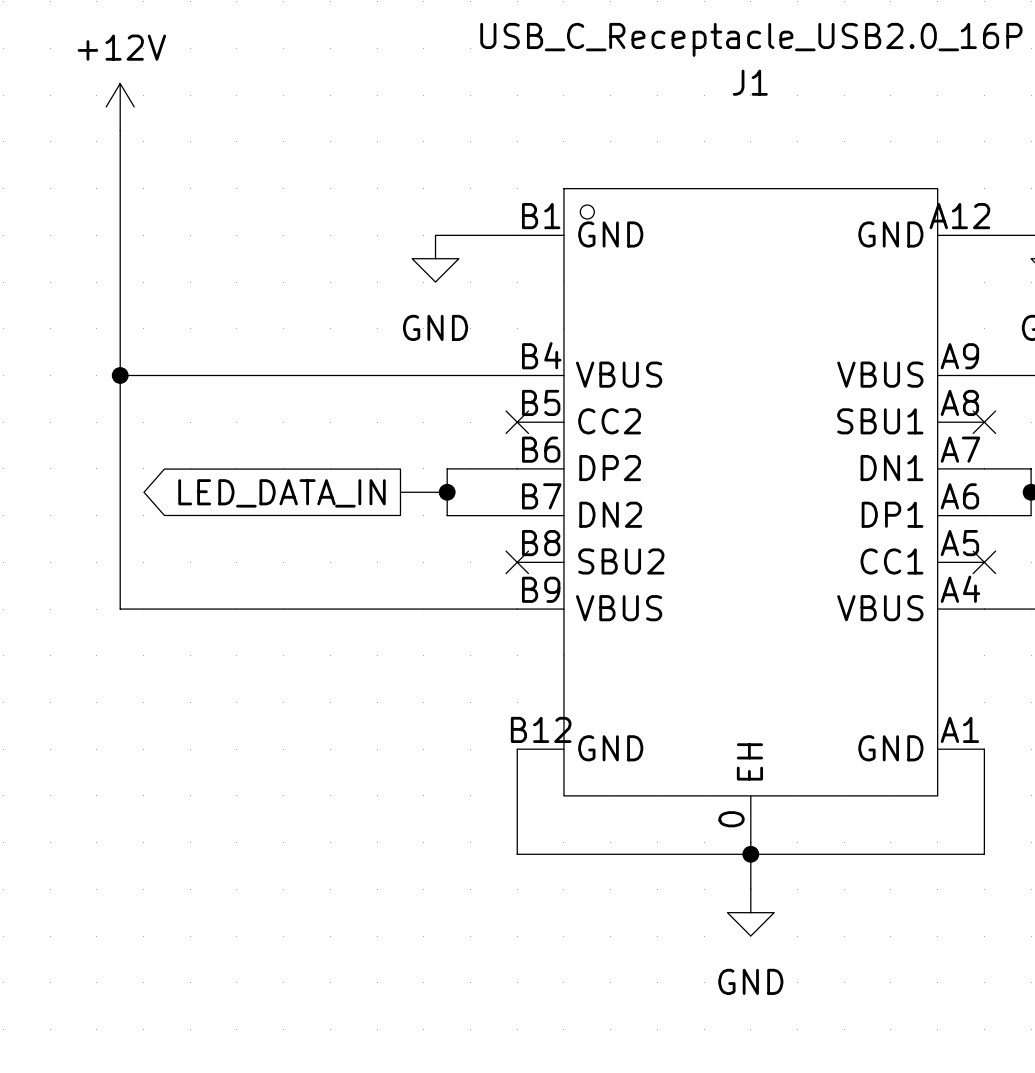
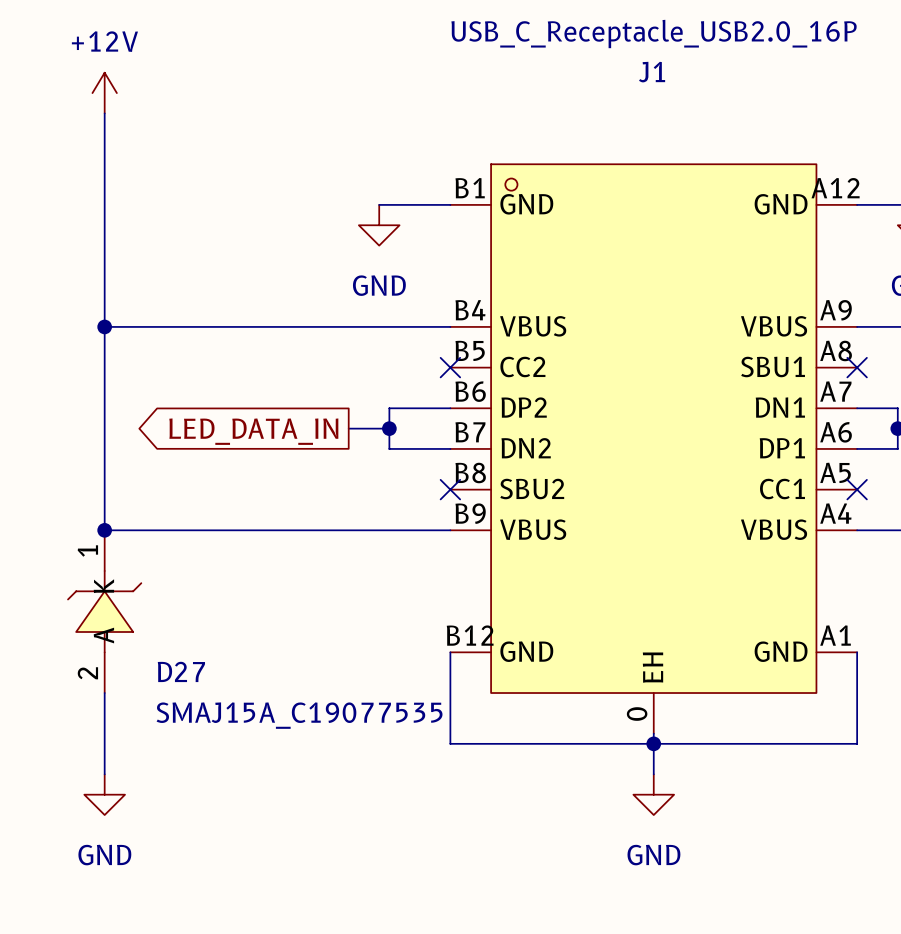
junction: none -> (104, 530)
D27: none -> SMAJ15A_C19077535 (104, 611)
wire: none -> (104, 693) (104, 774)
power symbol: none -> GND (104, 794)

